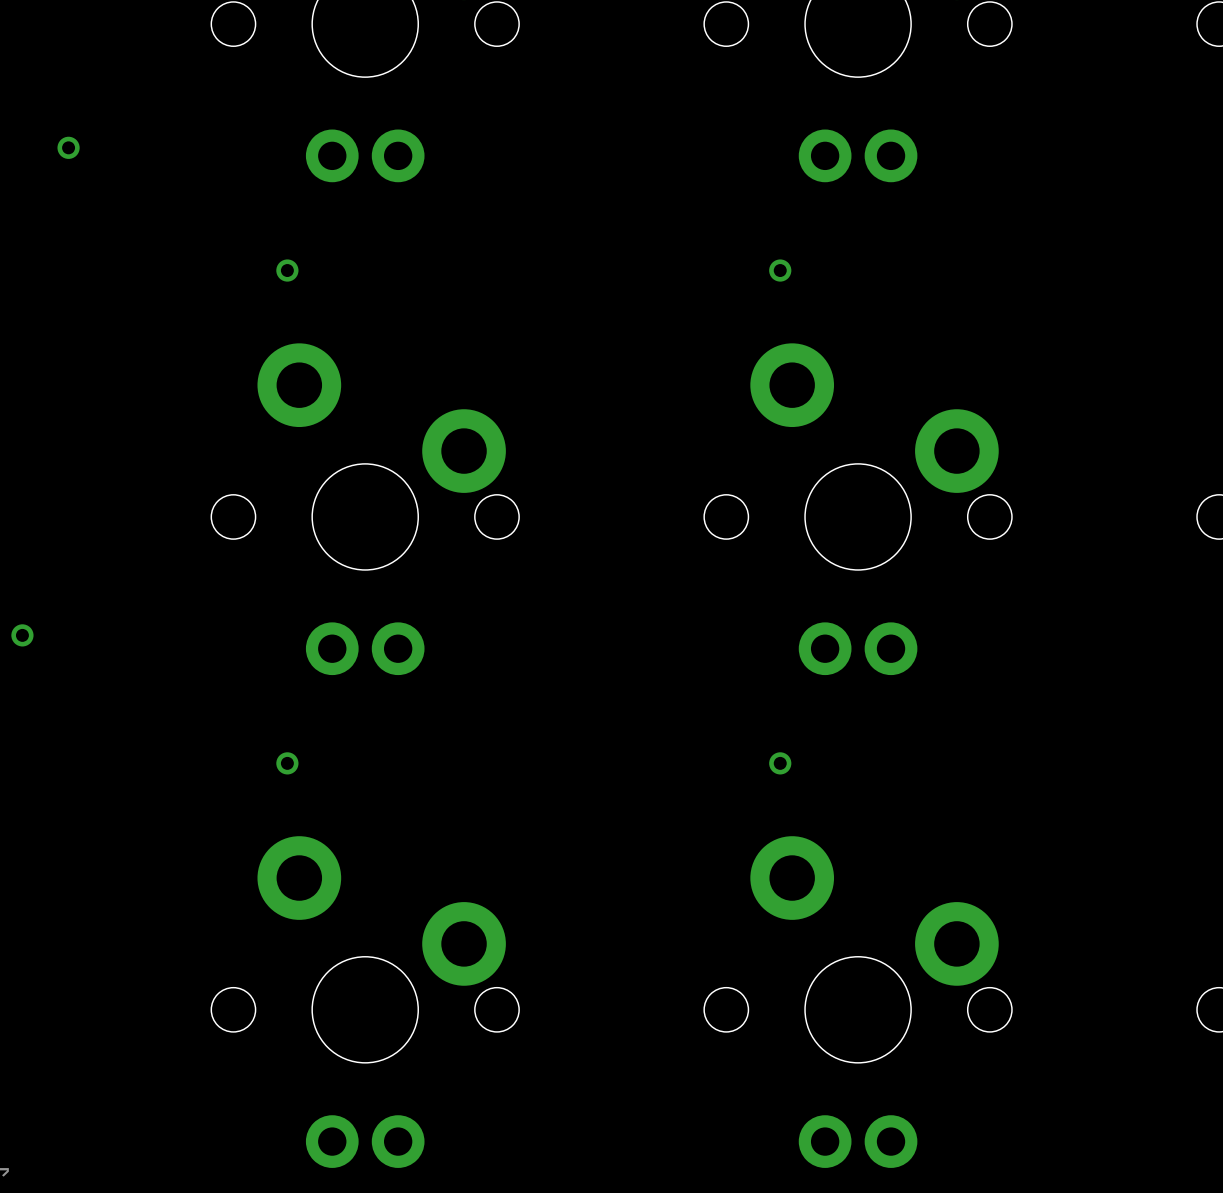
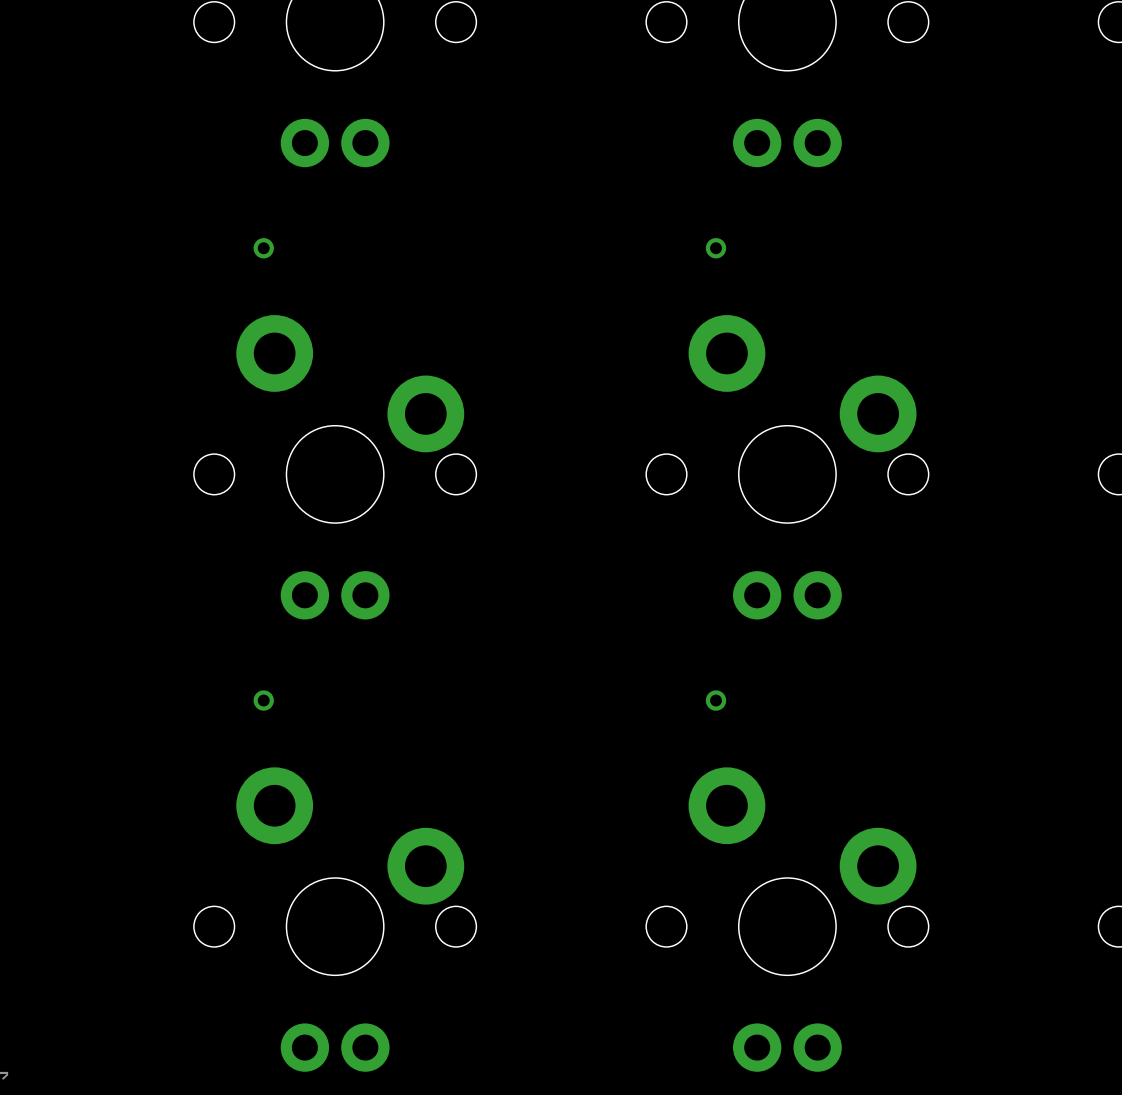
via: (68, 147) -> none
via: (22, 635) -> none

